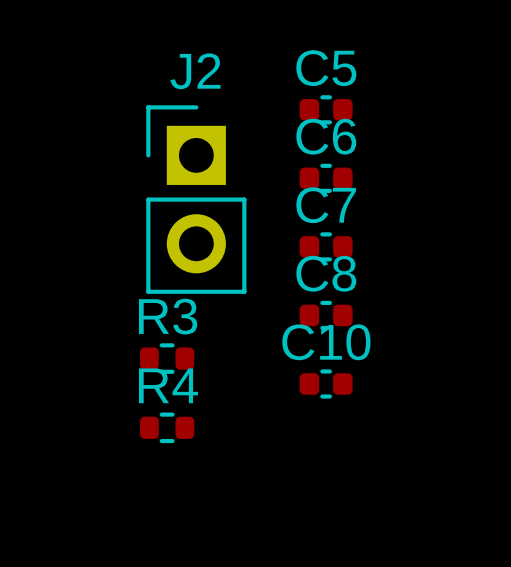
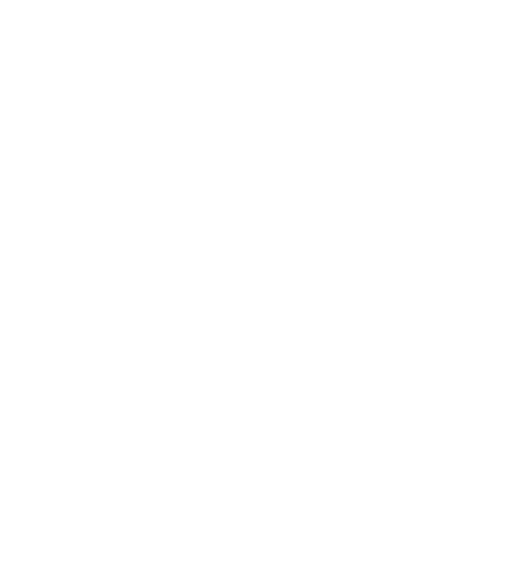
C5: (326, 109) -> none
C6: (326, 178) -> none
J2: (196, 199) -> none
C7: (326, 246) -> none
C8: (326, 315) -> none
R3: (167, 358) -> none
C10: (326, 383) -> none
R4: (167, 427) -> none

